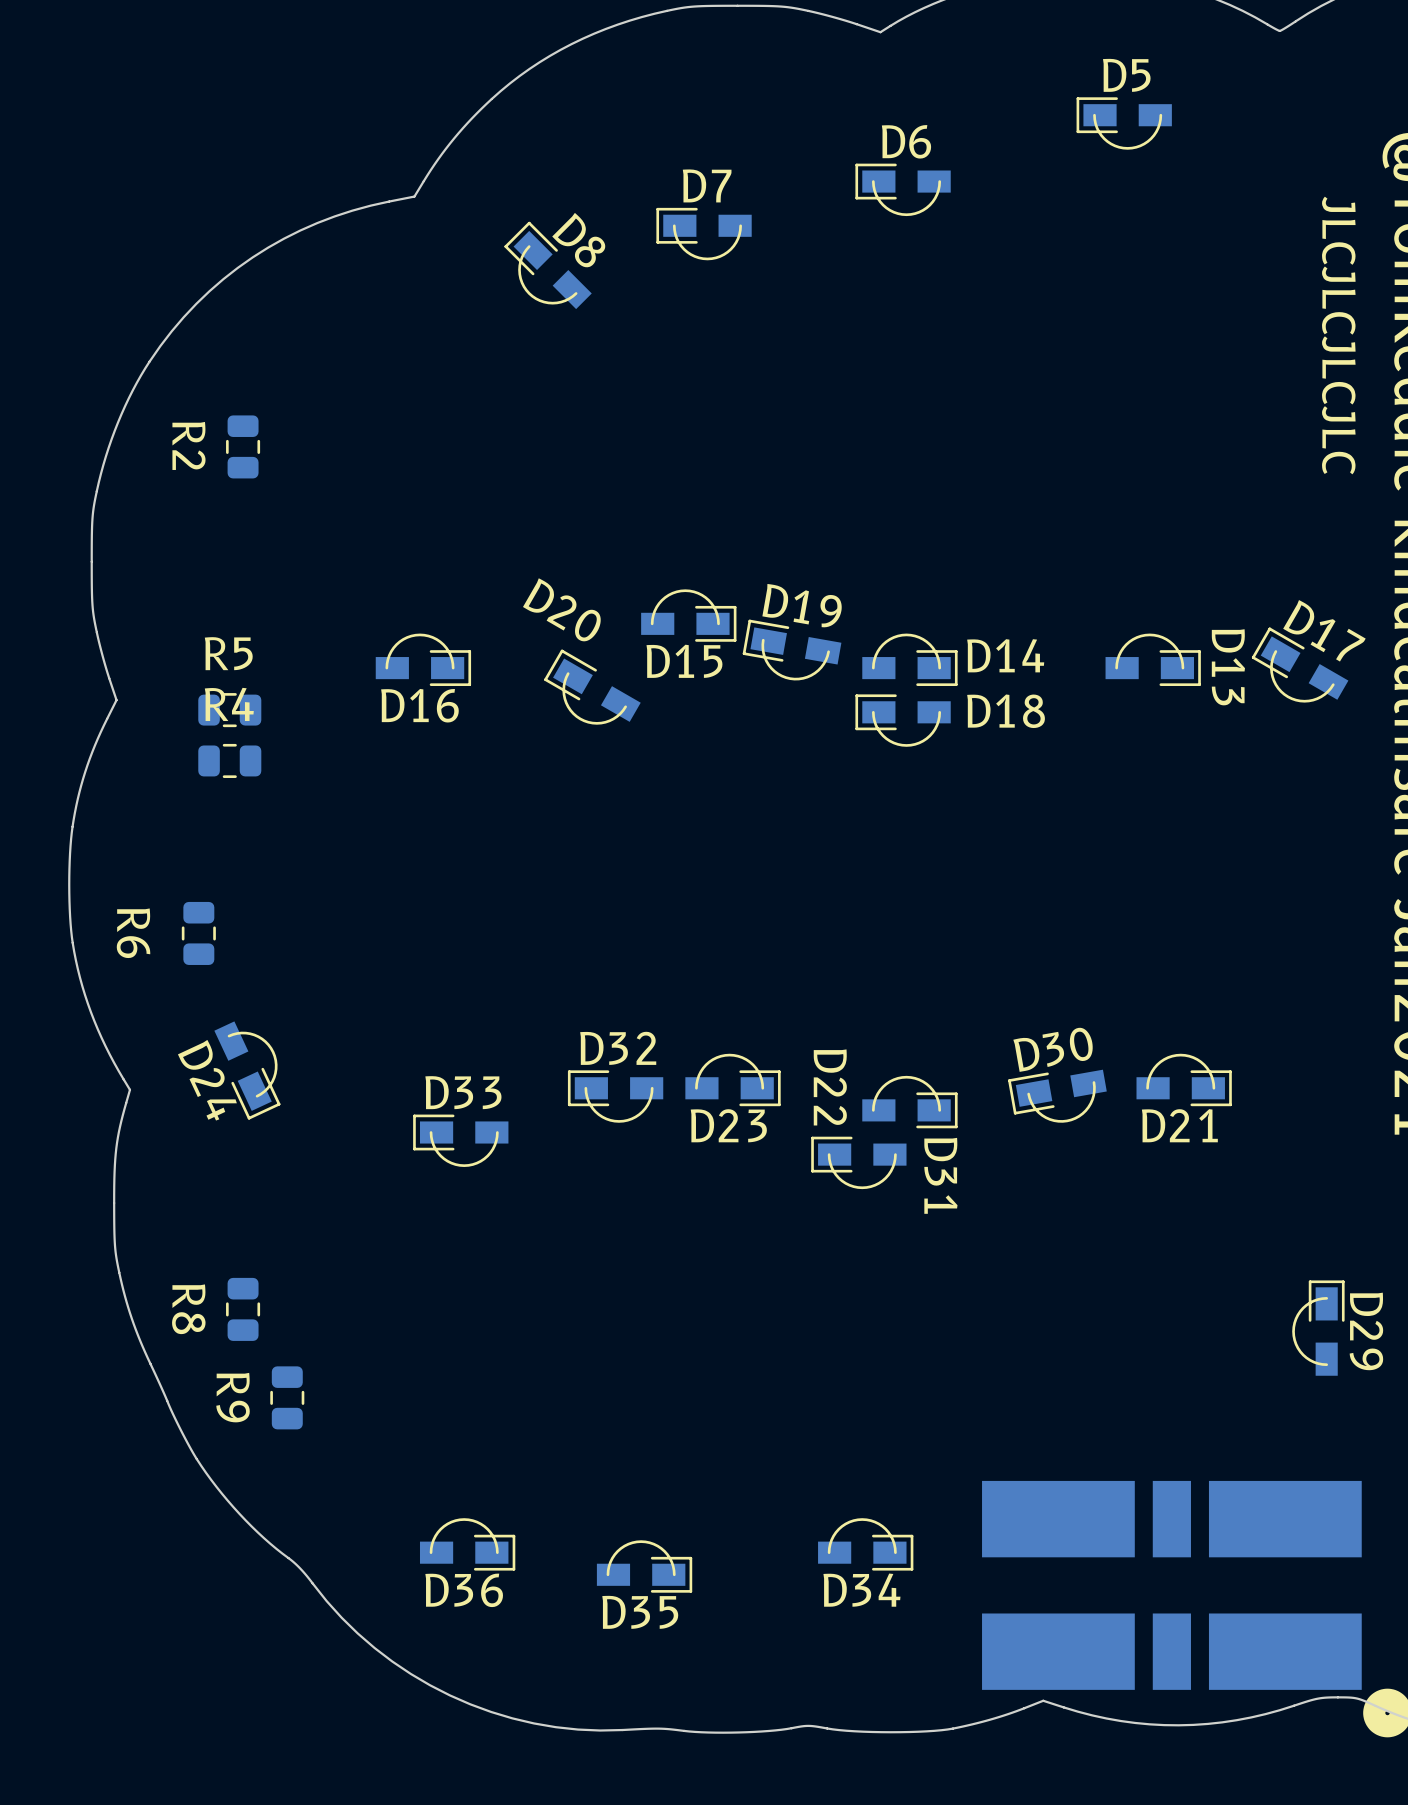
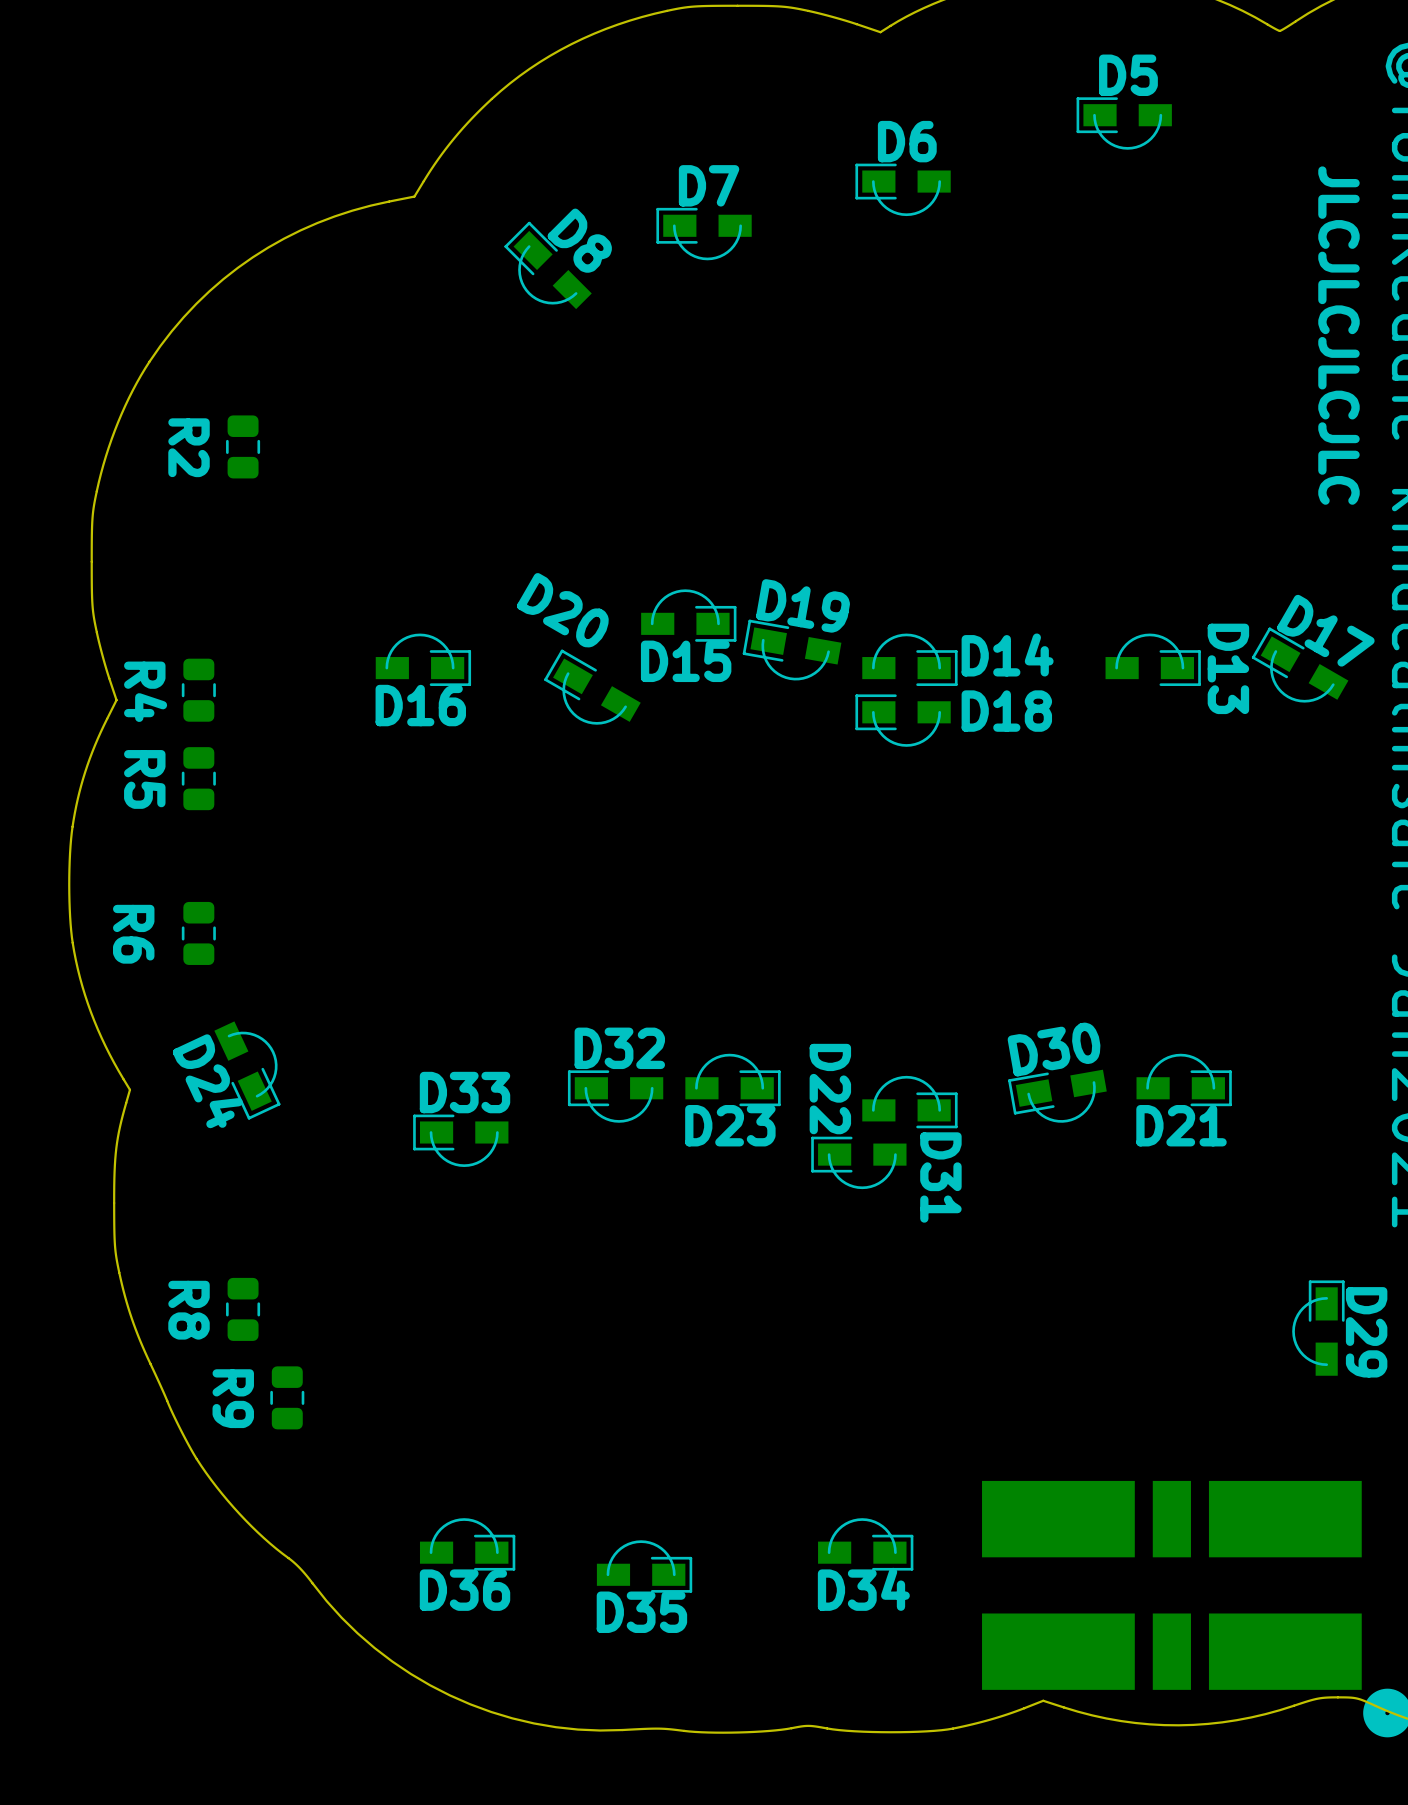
R5 name position: R5 (228, 653) -> R5 (144, 779)
R4 name position: R4 (229, 704) -> R4 (145, 691)
R5 rotation: 0° (229, 710) -> 90° clockwise (198, 778)
R5 position: (229, 710) -> (198, 778)
R4 rotation: 0° (229, 760) -> 90° clockwise (198, 690)
R4 position: (229, 760) -> (198, 690)

